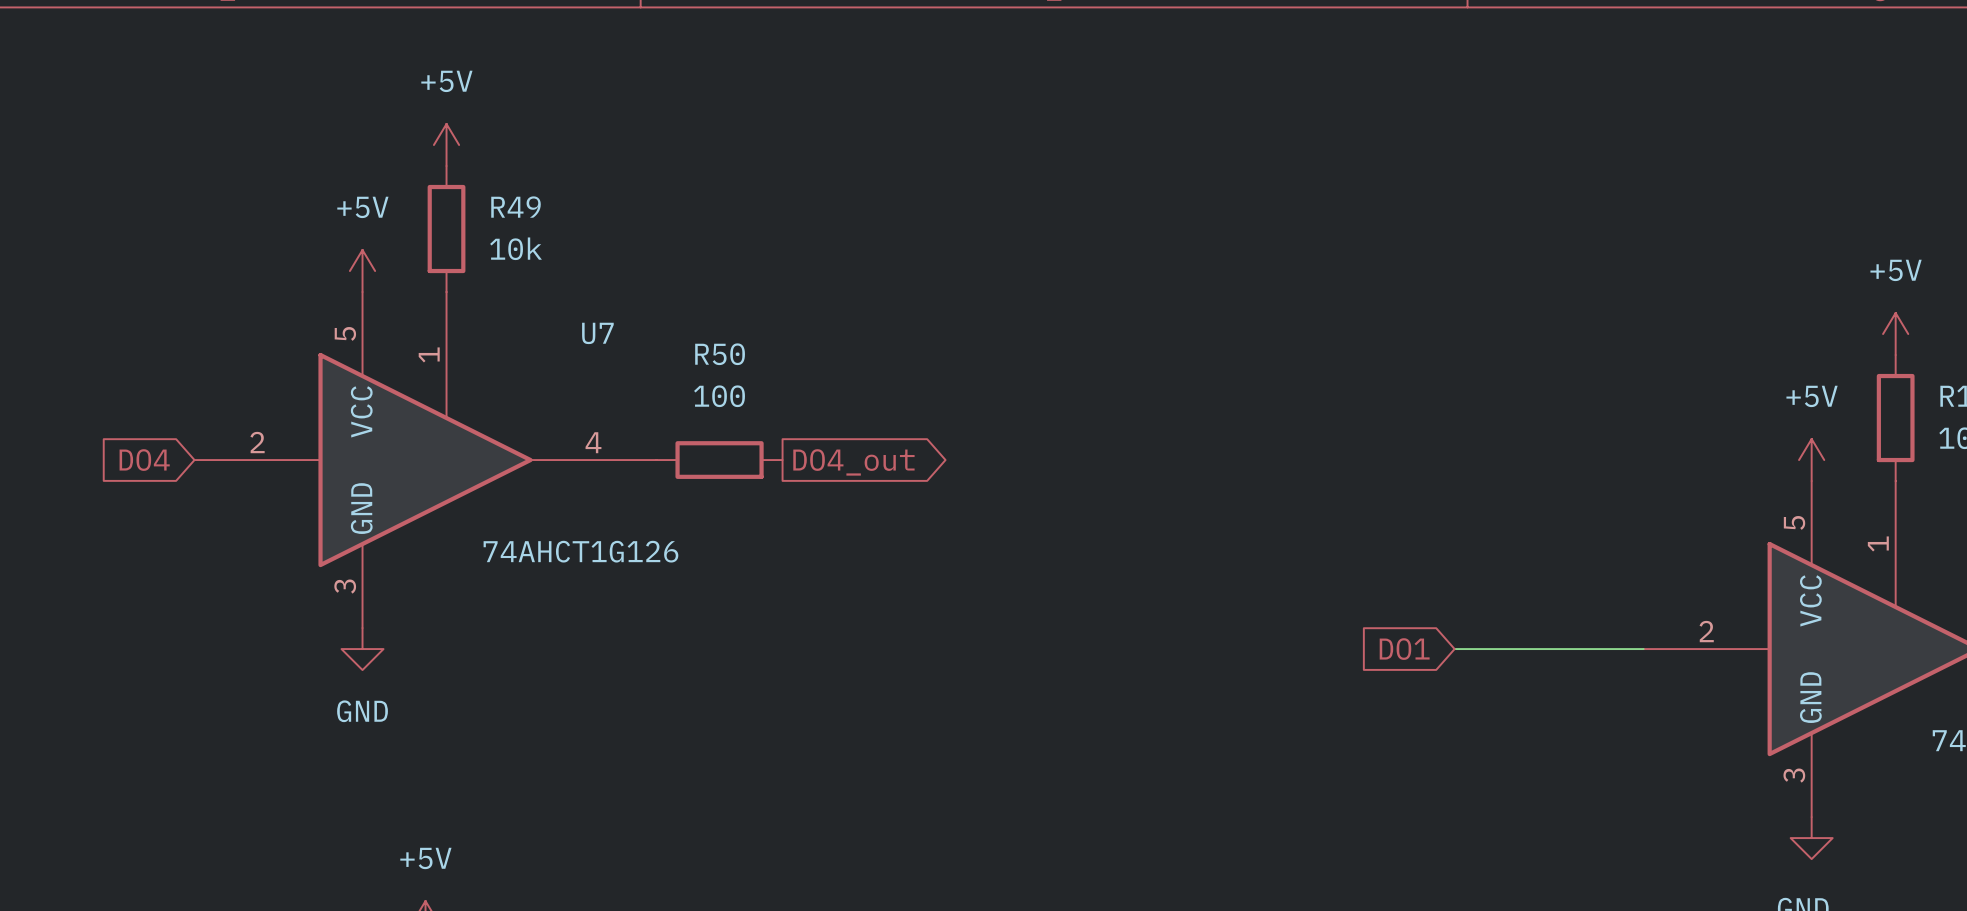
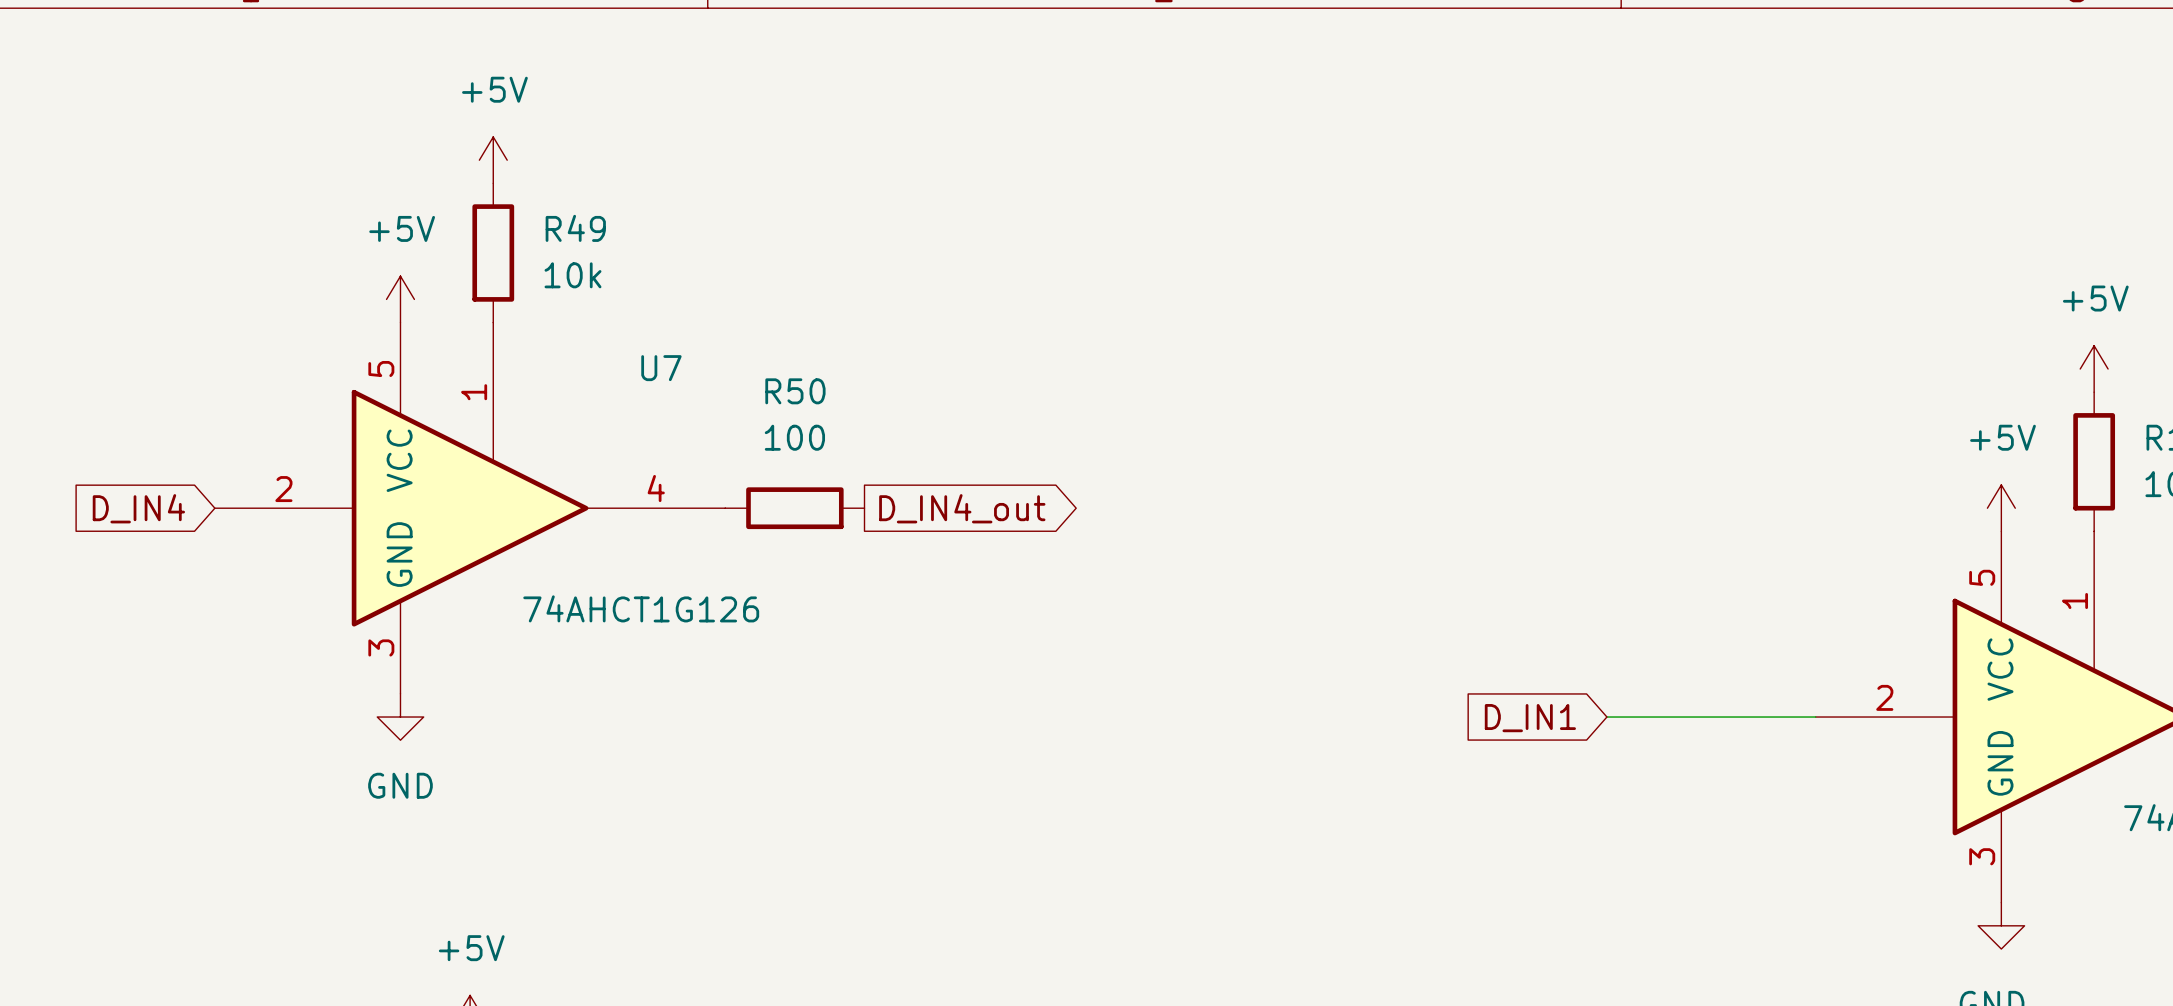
global label: DO4 (144, 460) -> D_IN4 (138, 508)
global label: DO4_out (853, 462) -> D_IN4_out (962, 508)
global label: DO1 (1404, 649) -> D_IN1 (1530, 718)

